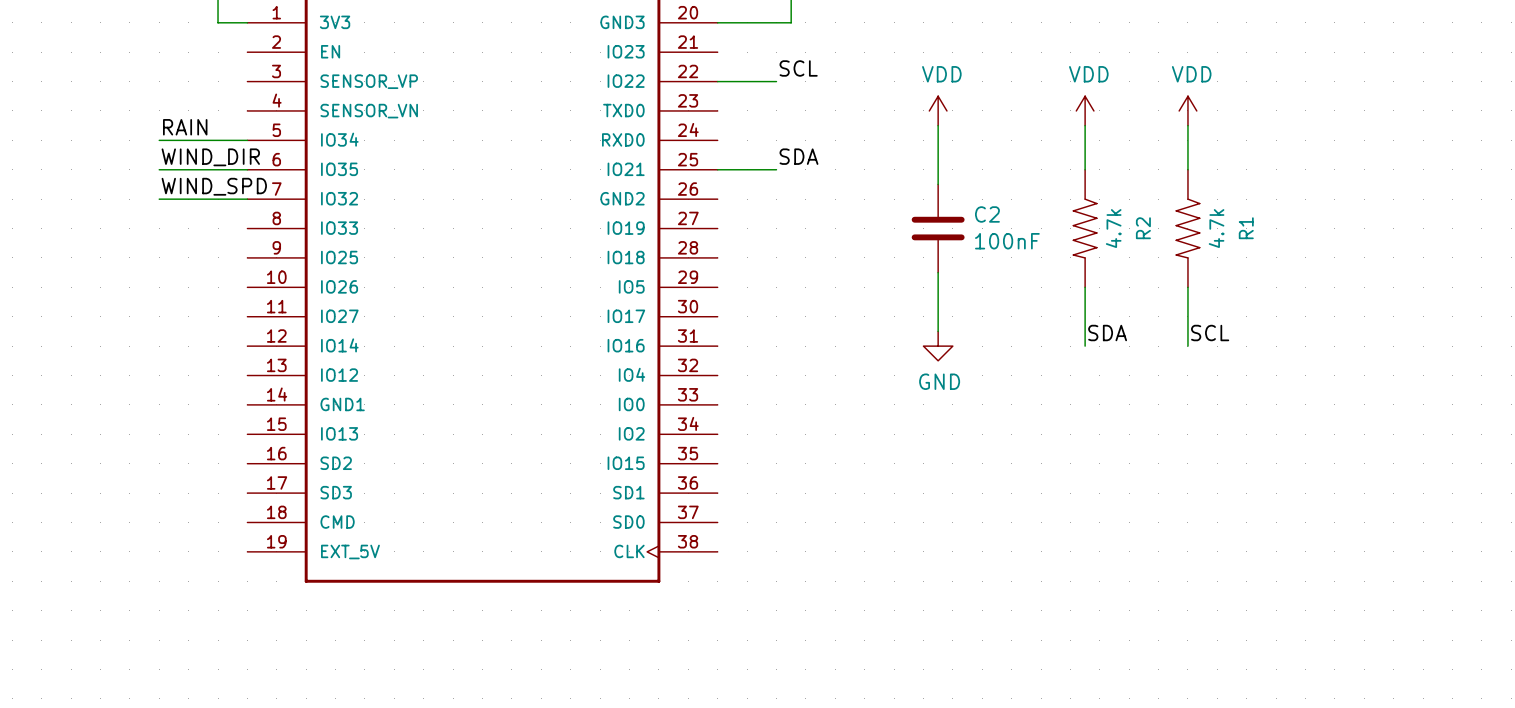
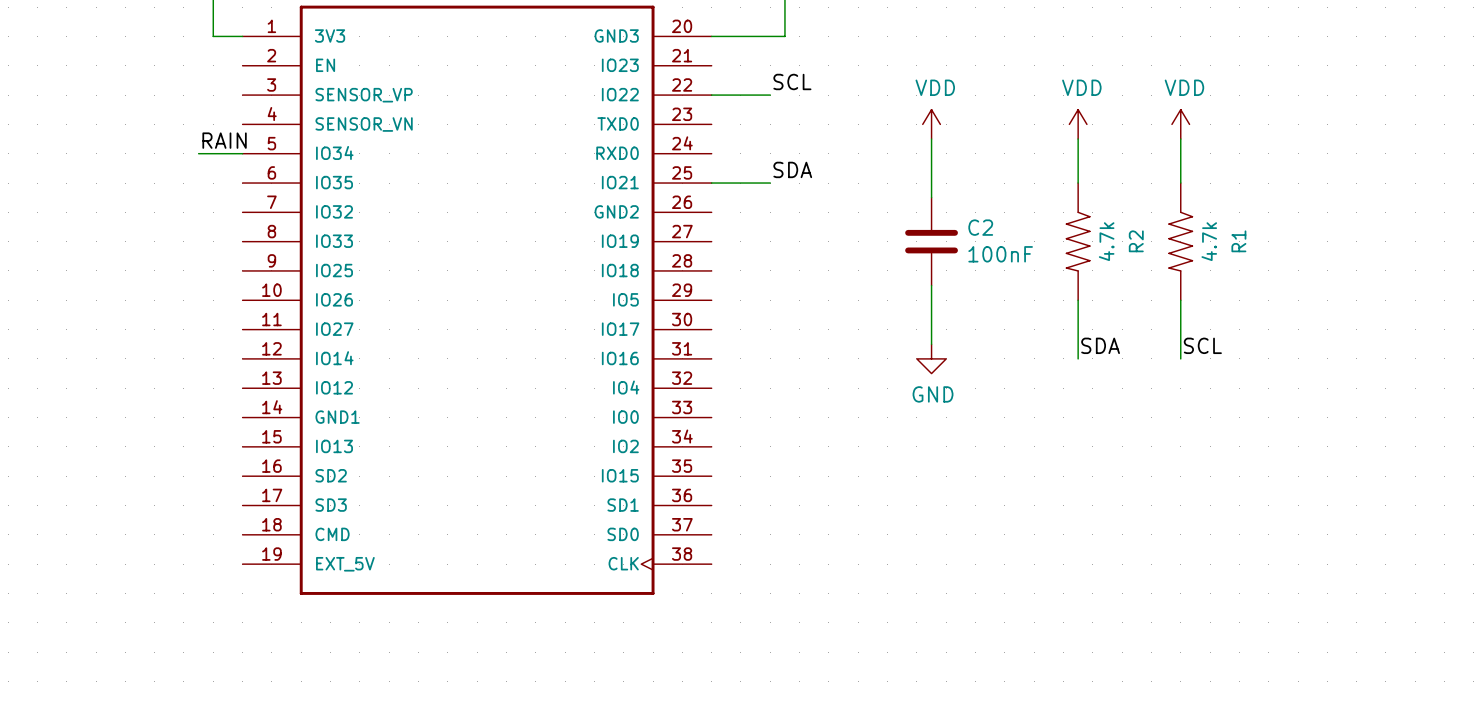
label position: RAIN (185, 127) -> RAIN (224, 140)
wire: (159, 140) (203, 140) -> none
label: WIND_DIR (210, 157) -> none
wire: (159, 169) (247, 169) -> none
label: WIND_SPD (214, 186) -> none
wire: (159, 199) (247, 199) -> none

